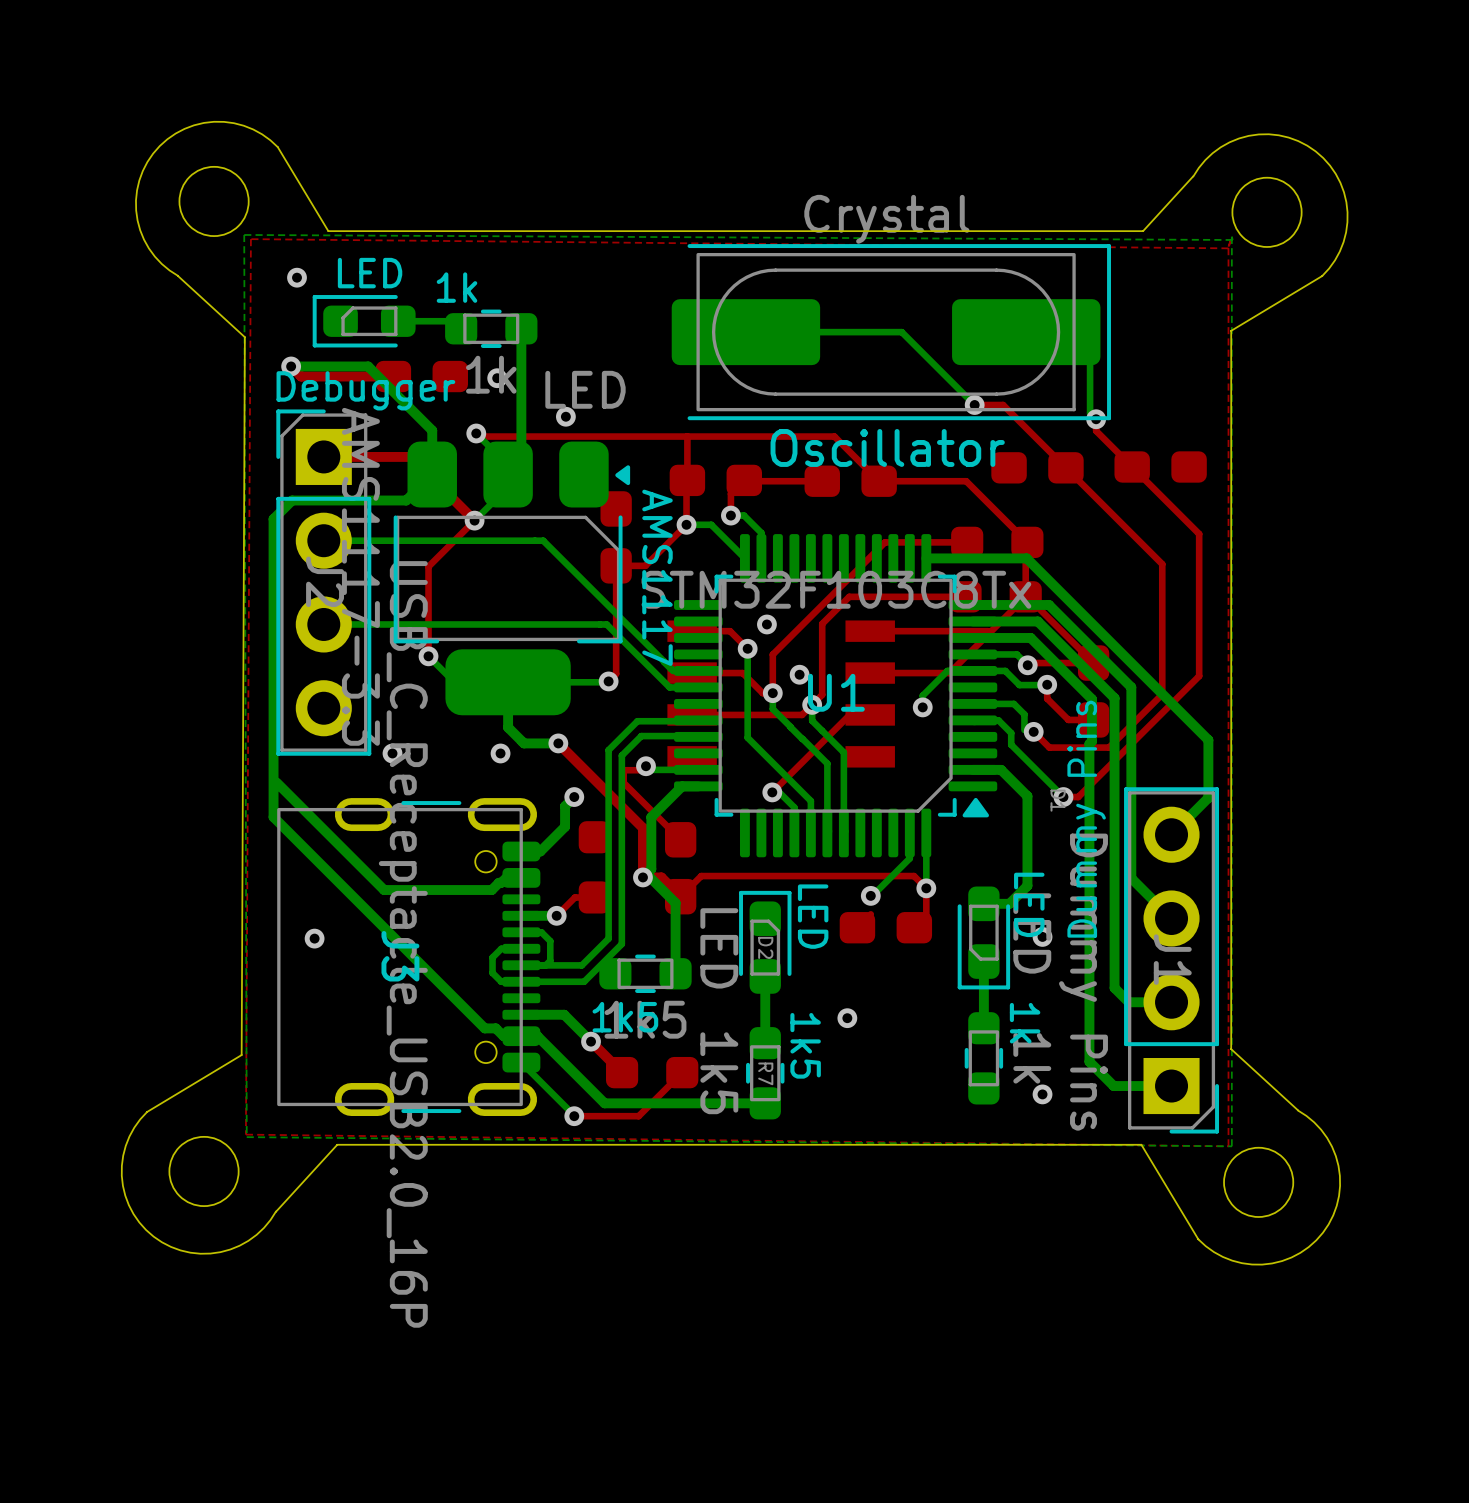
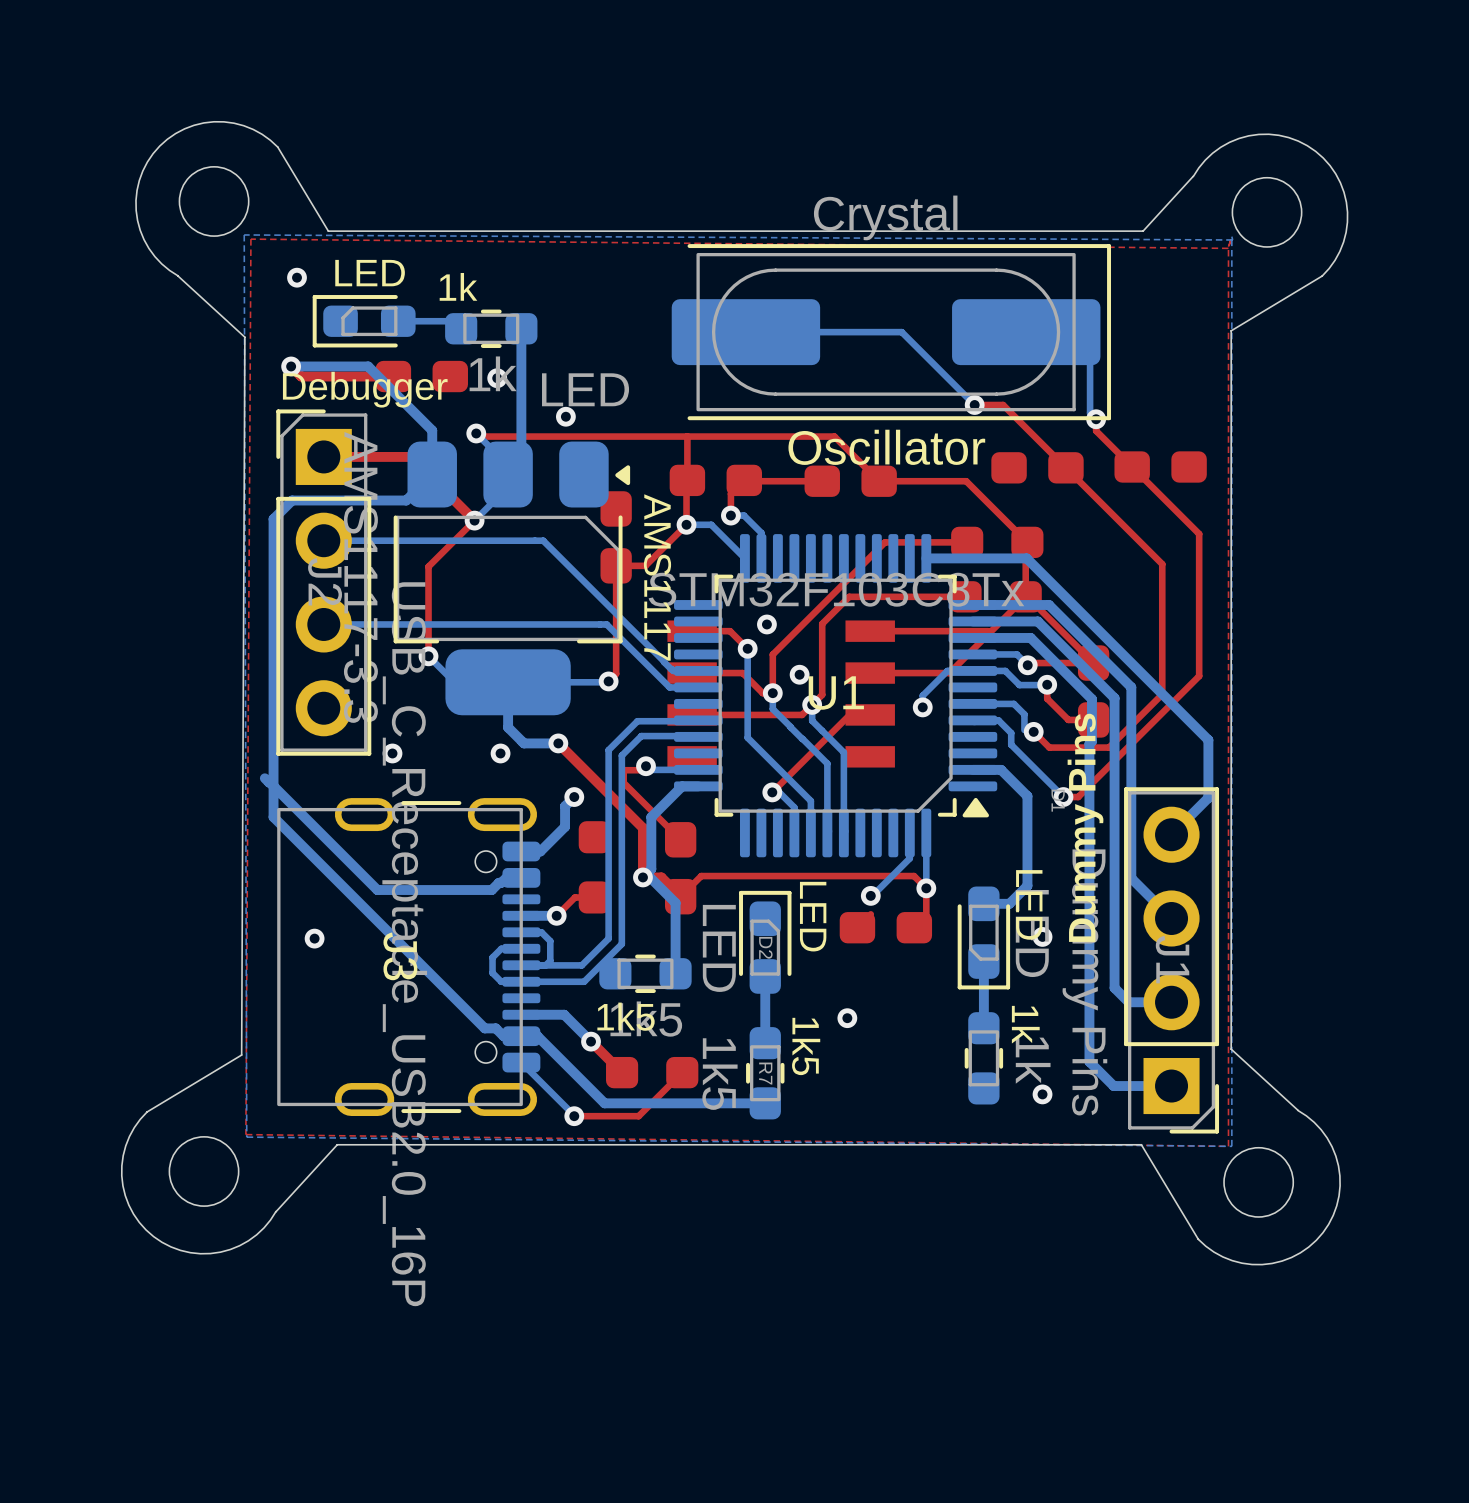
bottom track: (276, 782) (384, 890) -> (264, 778) (377, 890) (384, 890)

